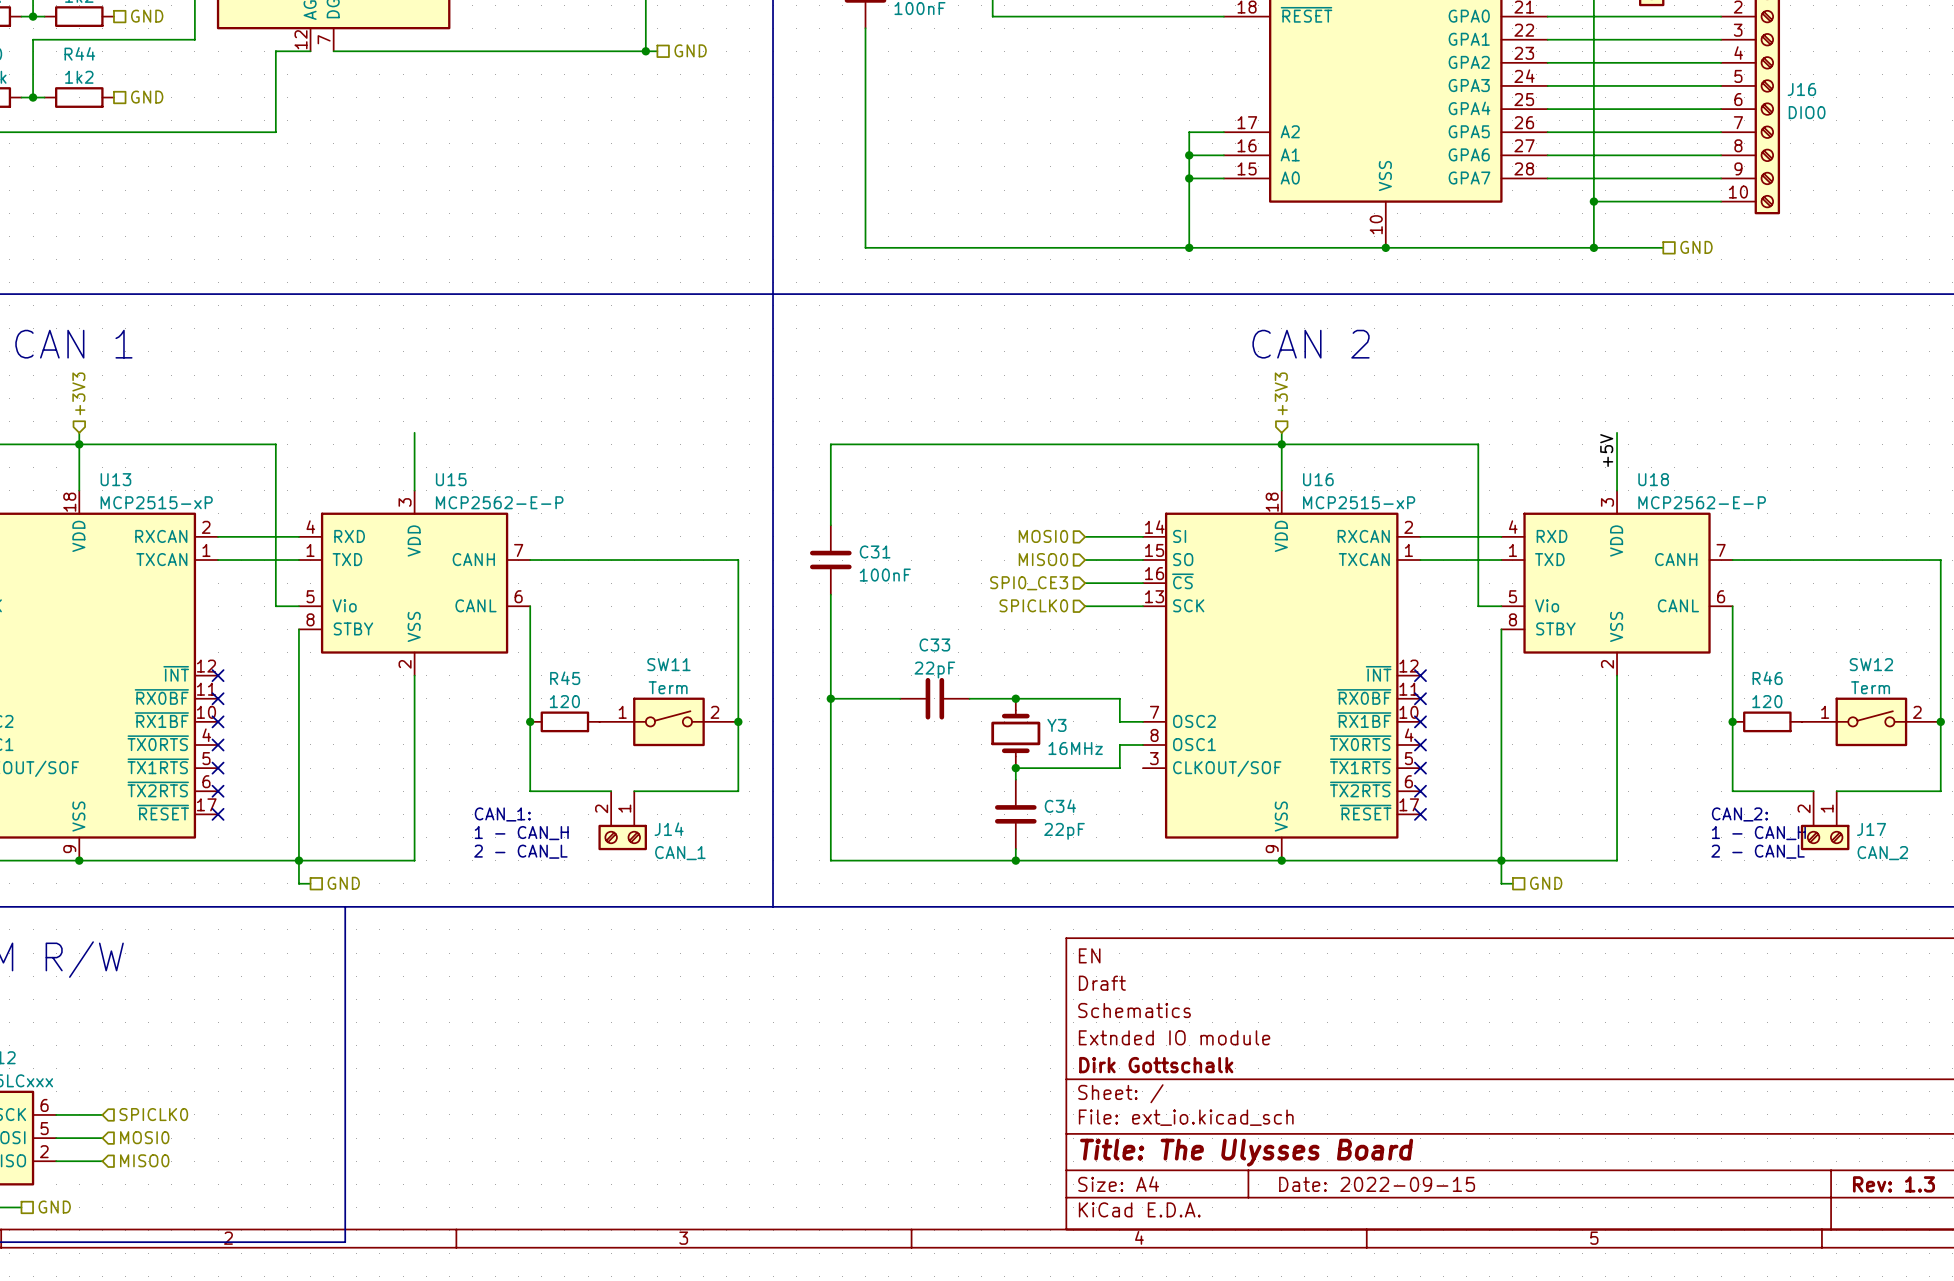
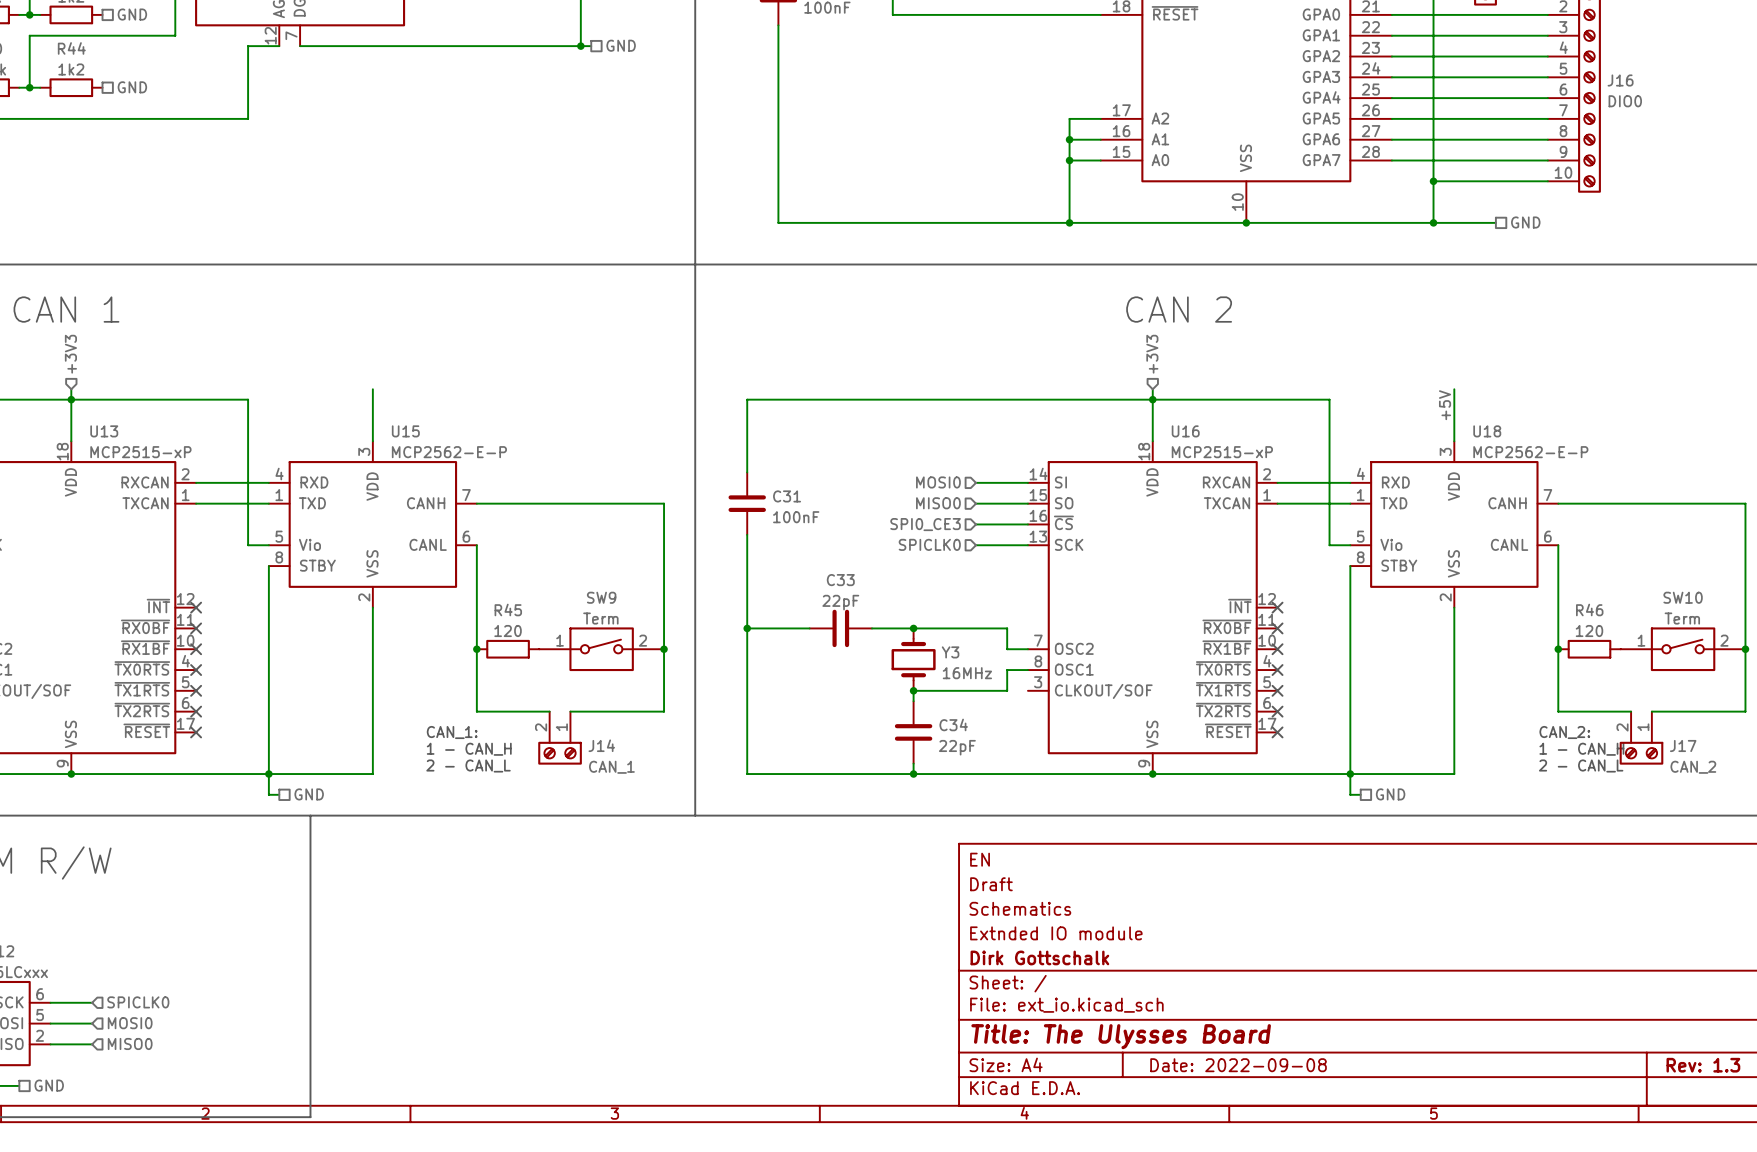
SW11 name: SW11 (668, 664) -> SW9 (601, 597)
SW12 name: SW12 (1871, 664) -> SW10 (1683, 597)
title block: Date: 2022-09-15 (1377, 1184) -> Date: 2022-09-08 (1238, 1065)

